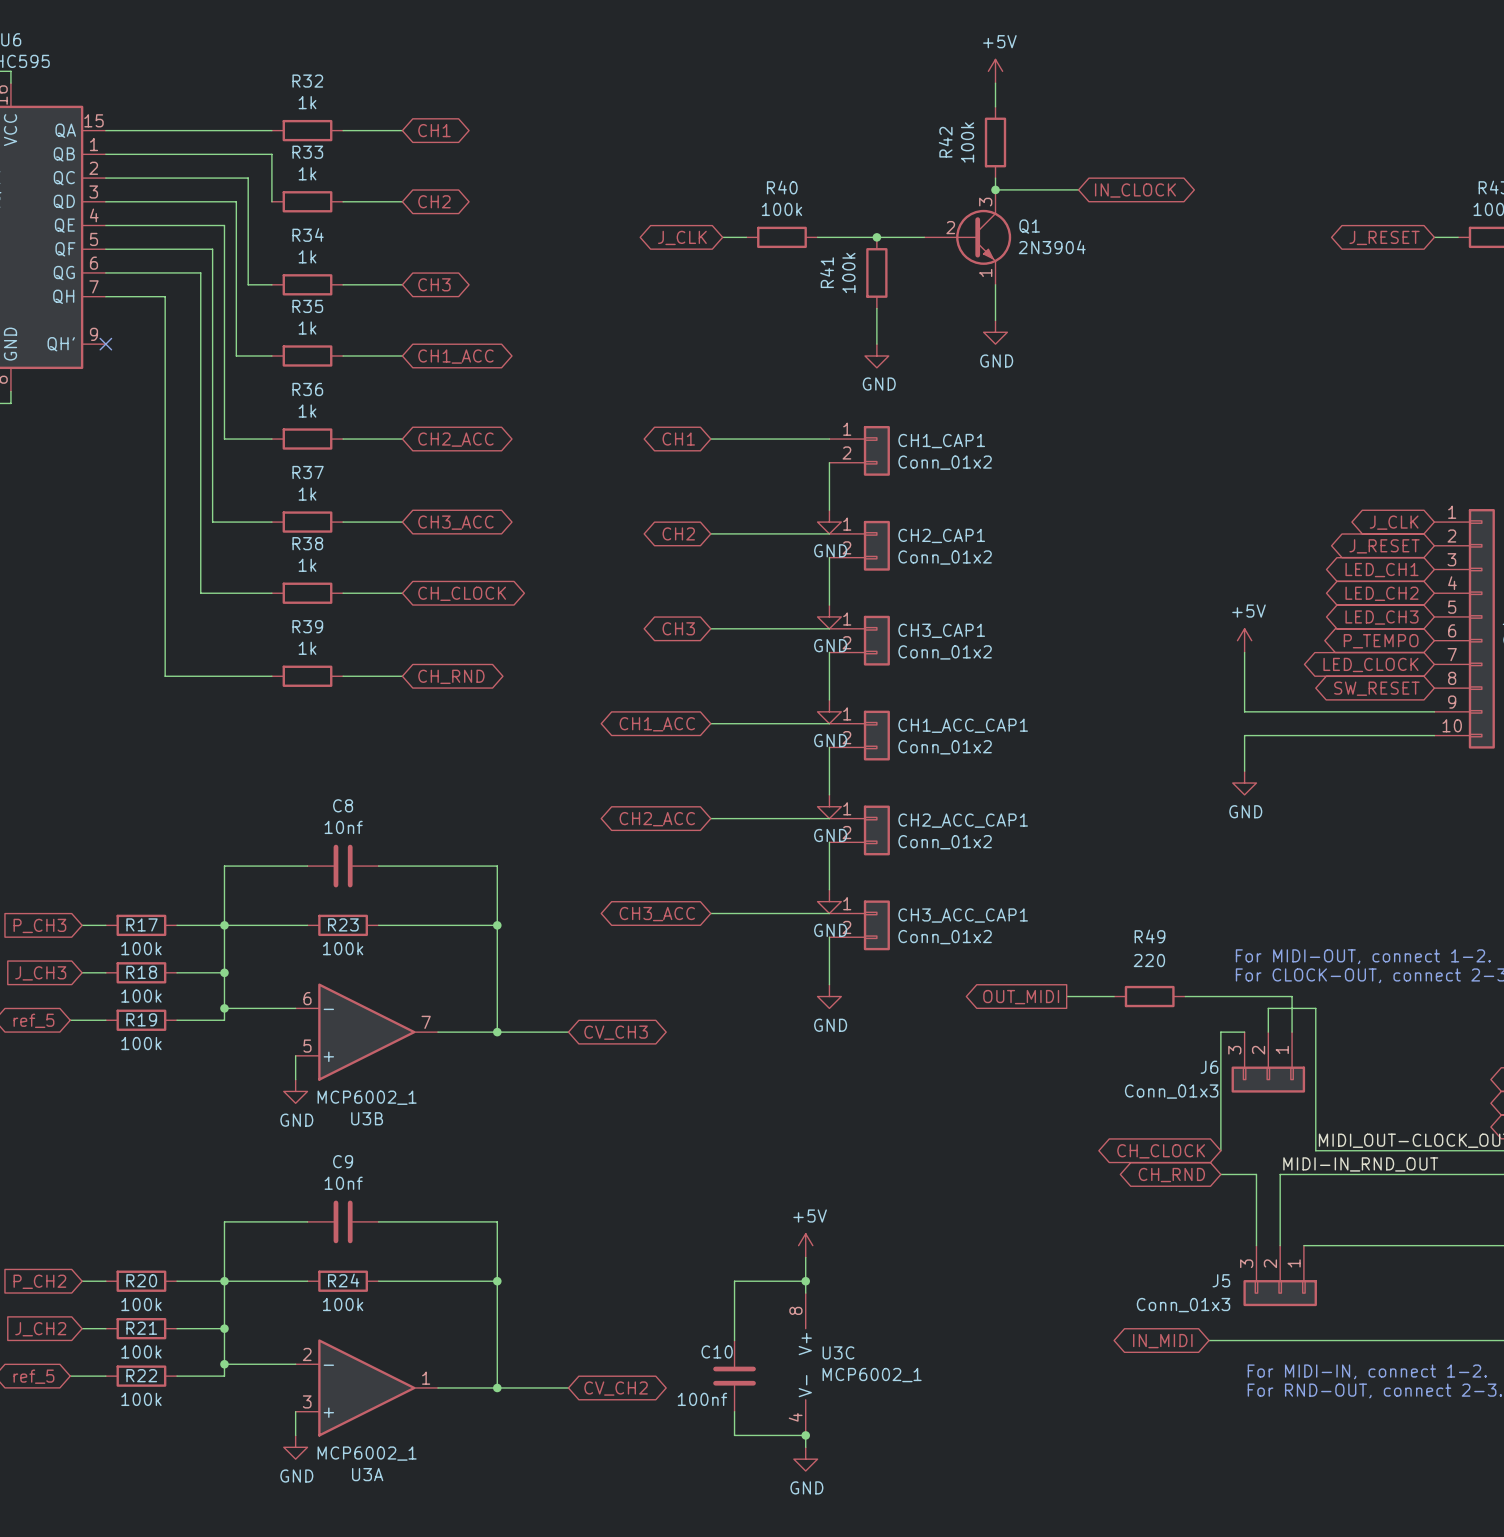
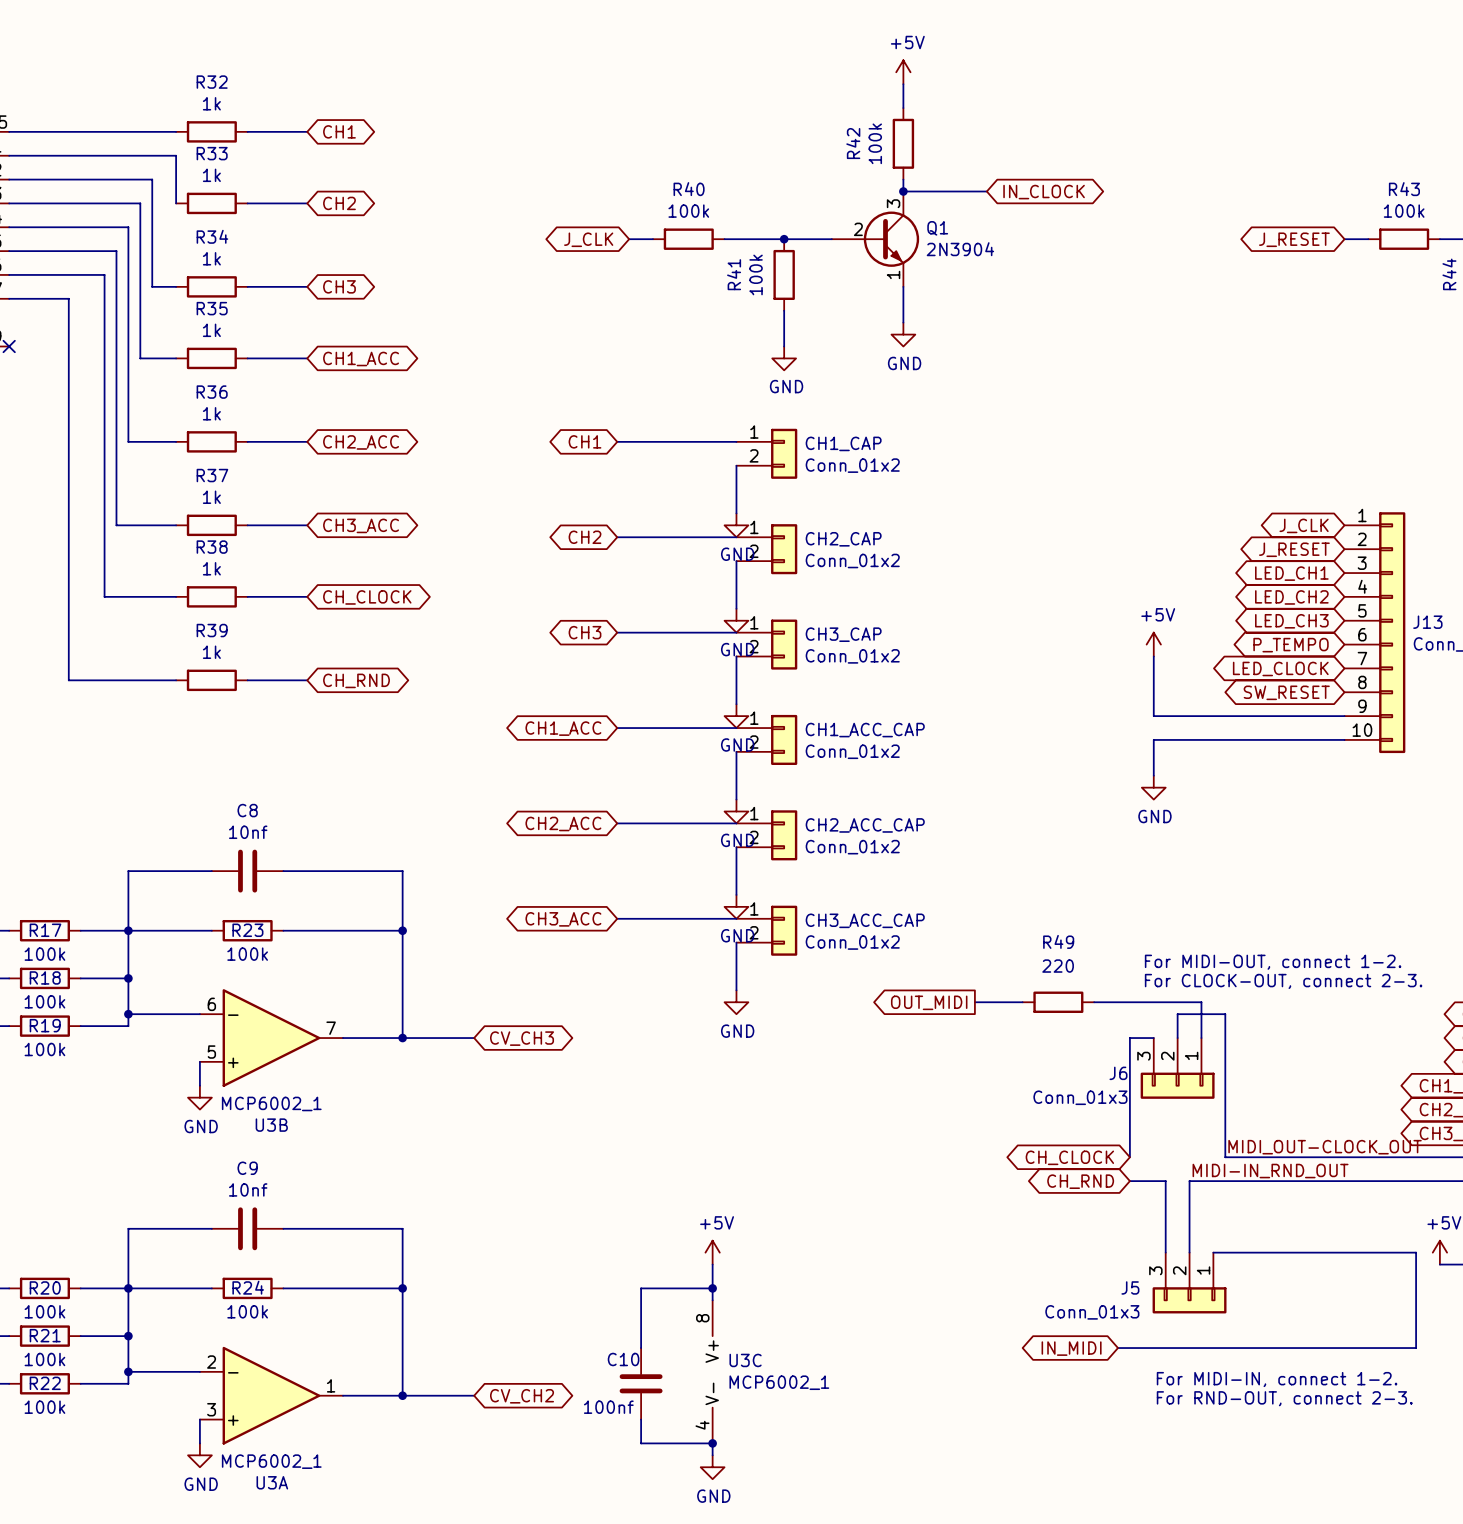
CH1_CAP1 name: CH1_CAP1 (941, 441) -> CH1_CAP (843, 443)
CH2_CAP1 name: CH2_CAP1 (941, 535) -> CH2_CAP (843, 539)
CH3_CAP1 name: CH3_CAP1 (941, 630) -> CH3_CAP (843, 634)
CH1_ACC_CAP1 name: CH1_ACC_CAP1 (963, 725) -> CH1_ACC_CAP (865, 730)
CH2_ACC_CAP1 name: CH2_ACC_CAP1 (963, 820) -> CH2_ACC_CAP (865, 825)
CH3_ACC_CAP1 name: CH3_ACC_CAP1 (963, 915) -> CH3_ACC_CAP (865, 920)

